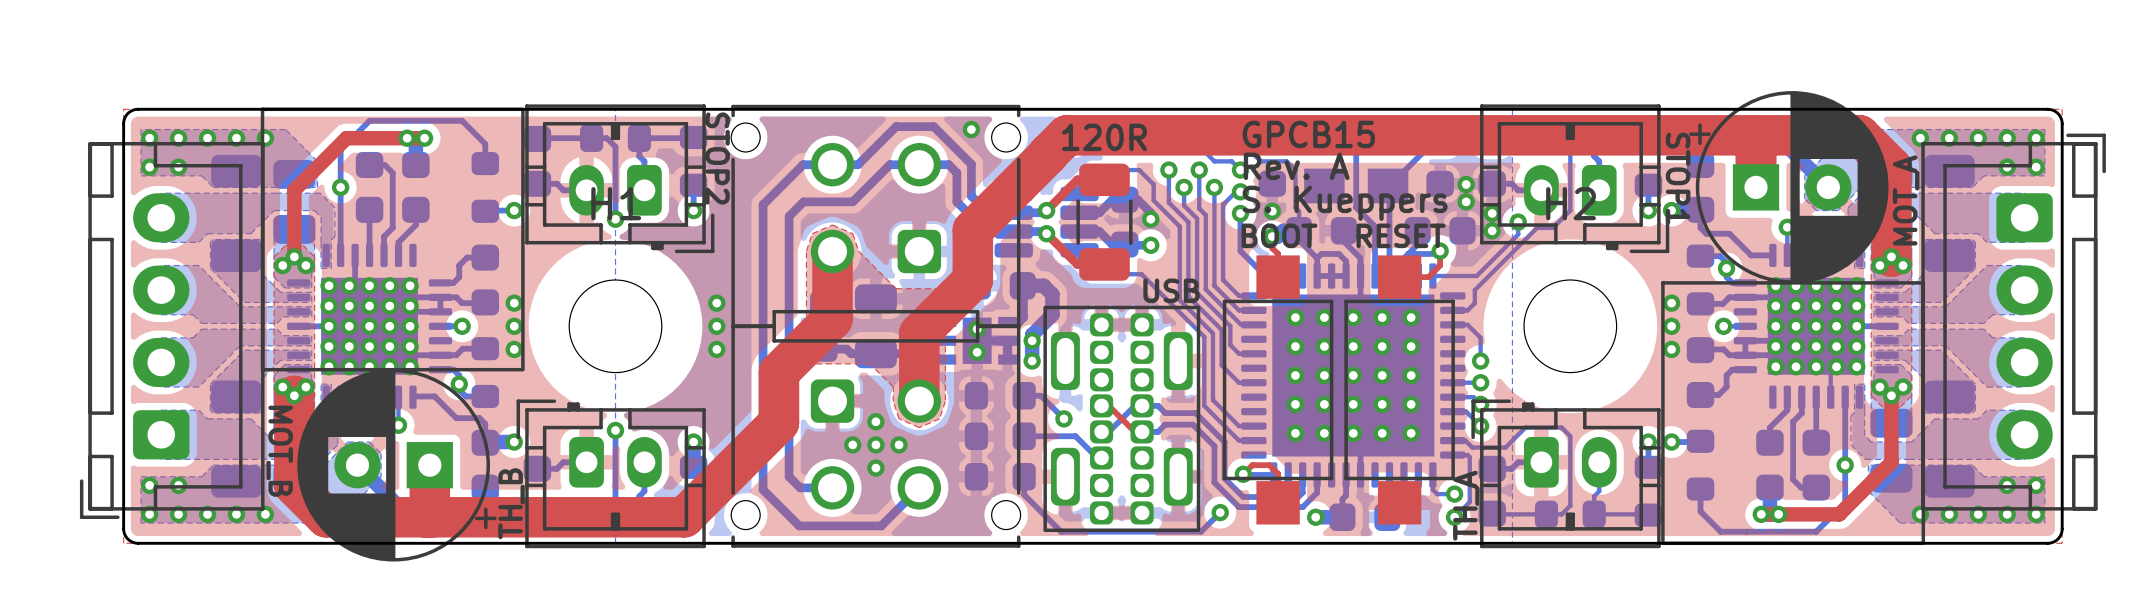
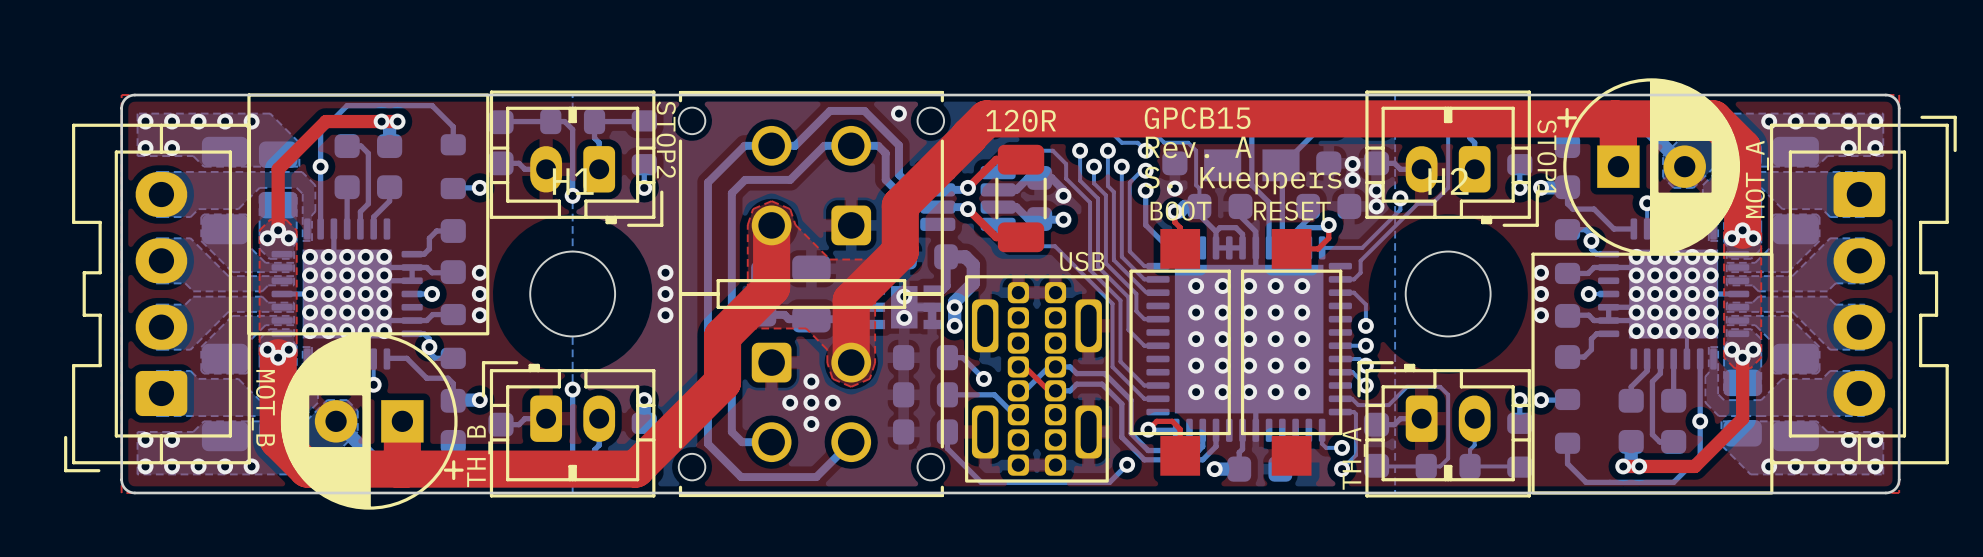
part footprint: [1921, 133, 2106, 511] -> [1769, 115, 1957, 465]
part footprint: [79, 141, 265, 519] -> [64, 123, 251, 473]

